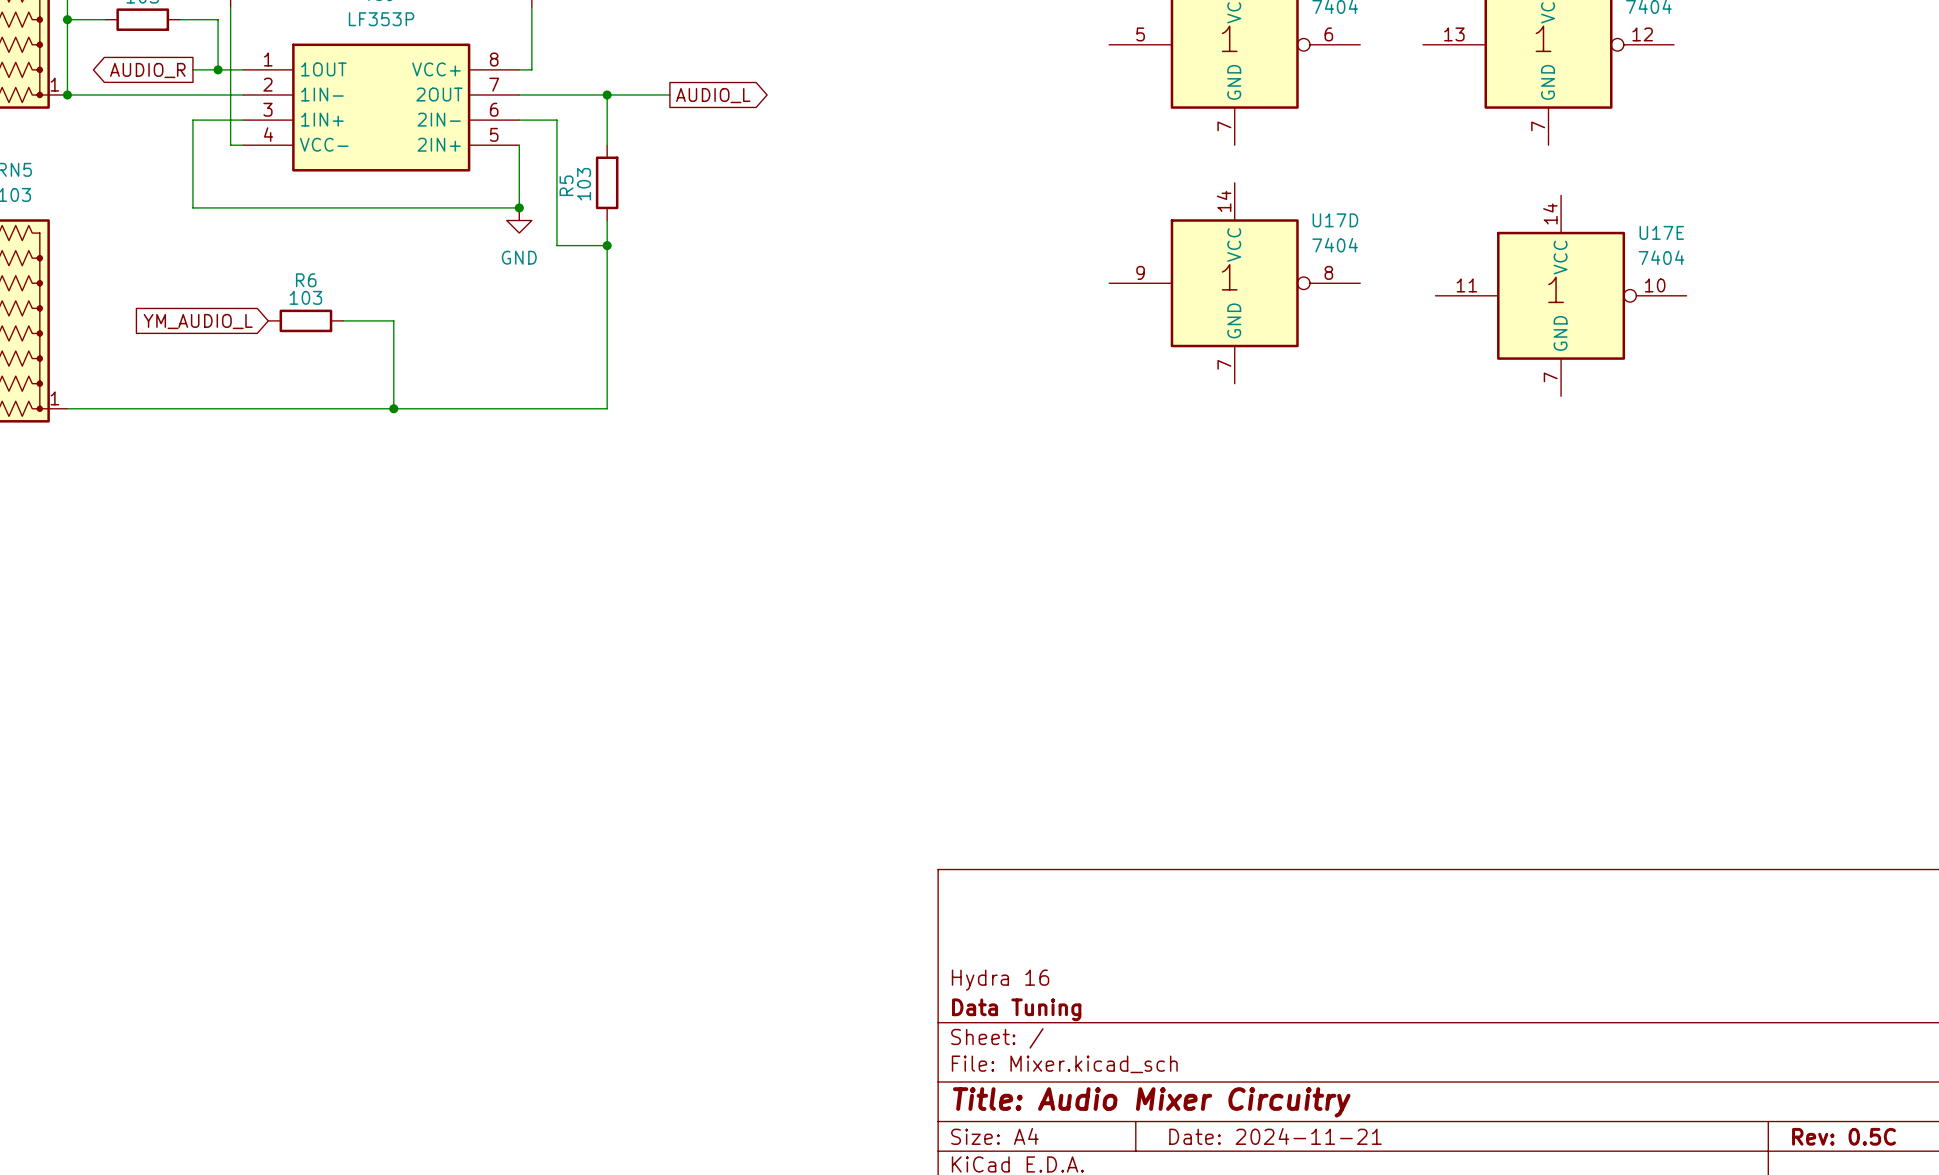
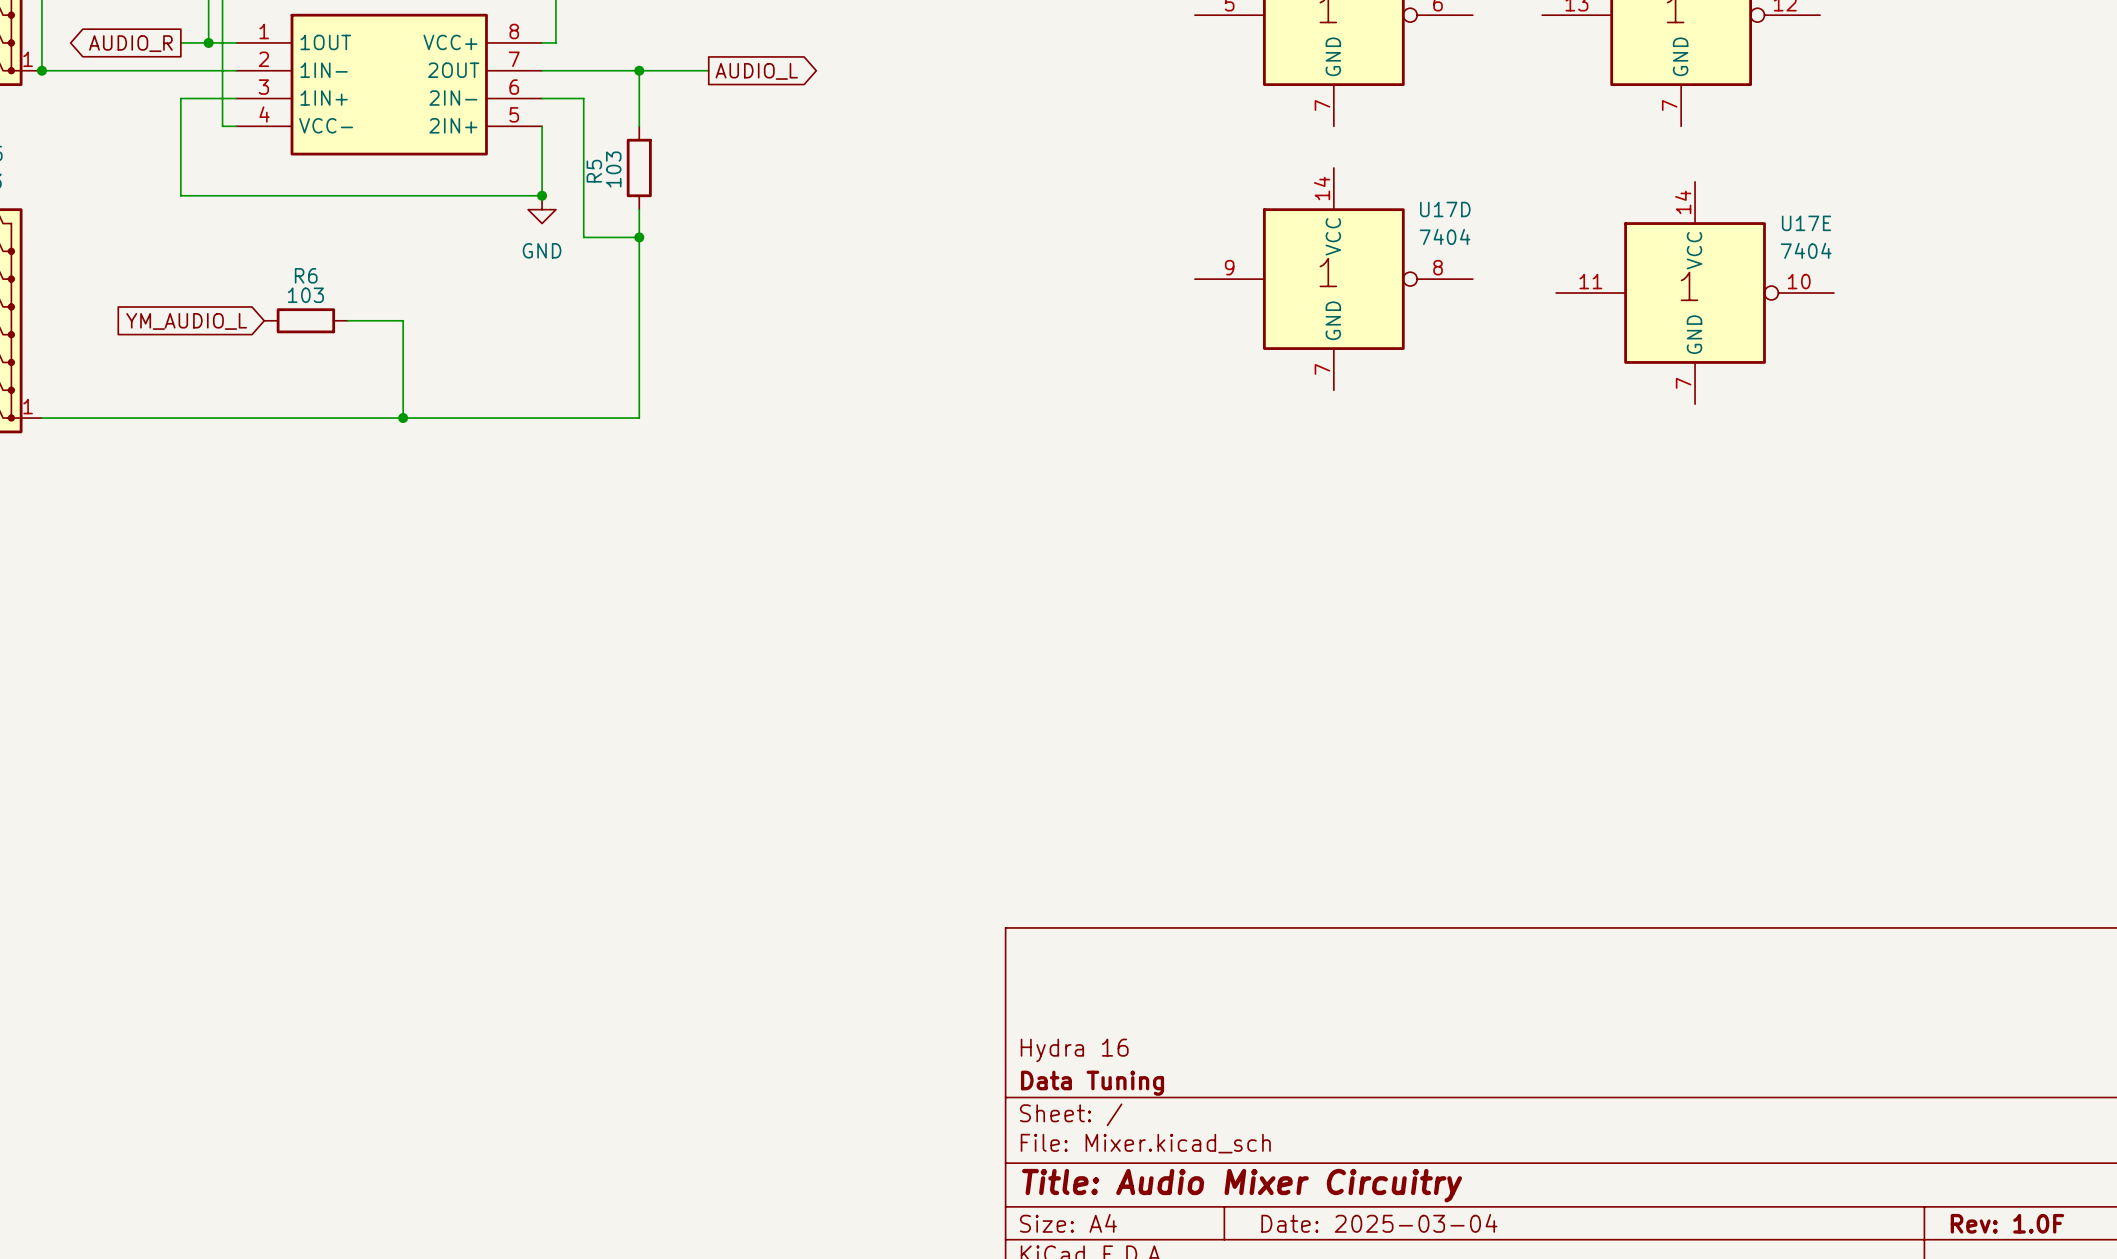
title block: Date: 2024-11-21 (1275, 1136) -> Date: 2025-03-04 (1379, 1223)
title block: Rev: 0.5C (1844, 1136) -> Rev: 1.0F (2007, 1223)

